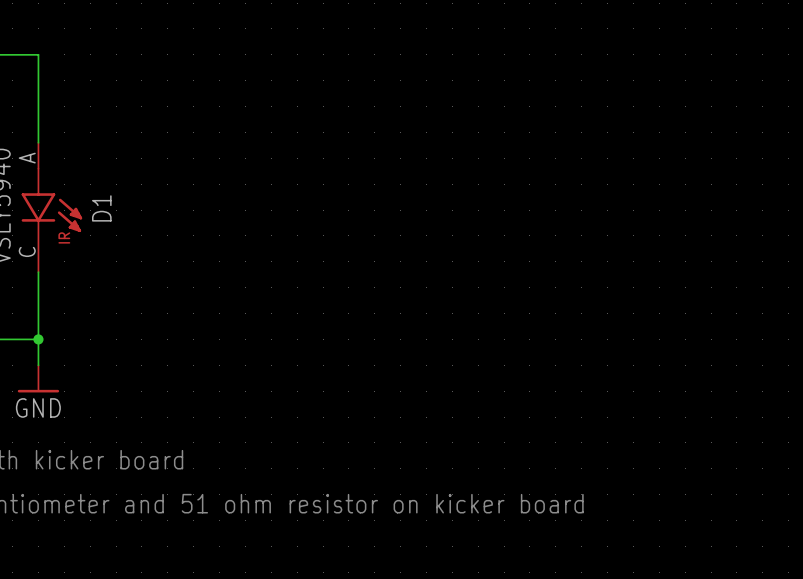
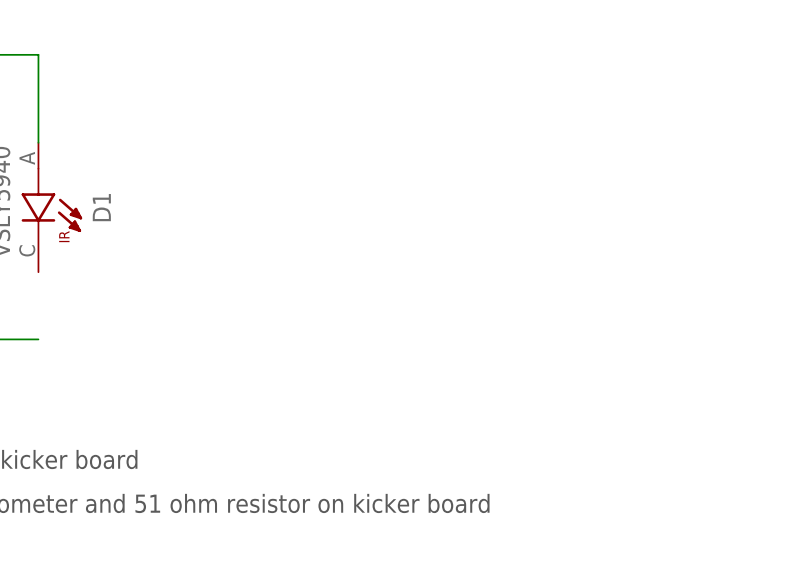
wire: (38, 272) (38, 365) -> none
junction: (38, 339) -> none
power symbol: GND (38, 378) -> none

